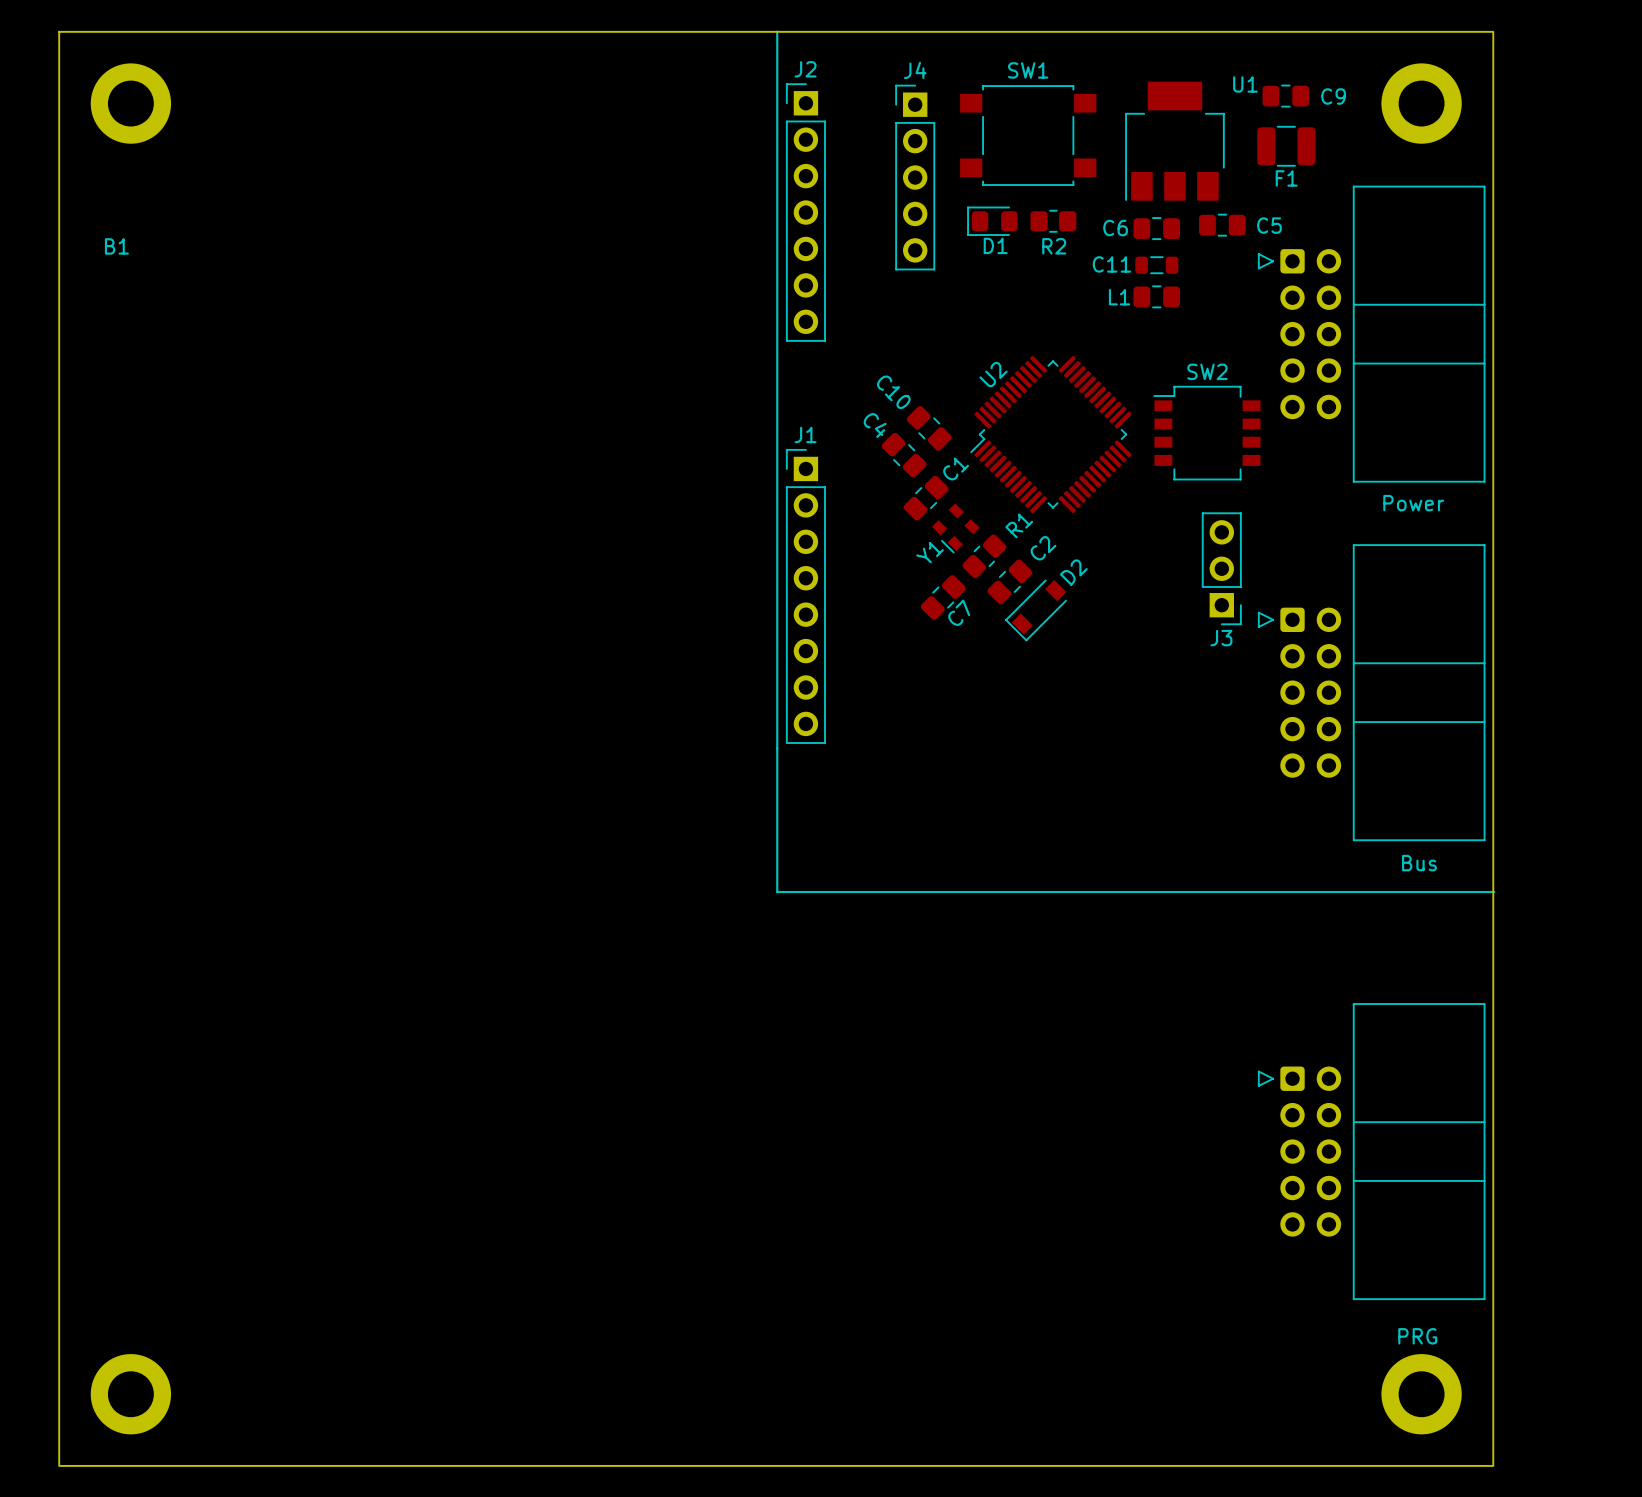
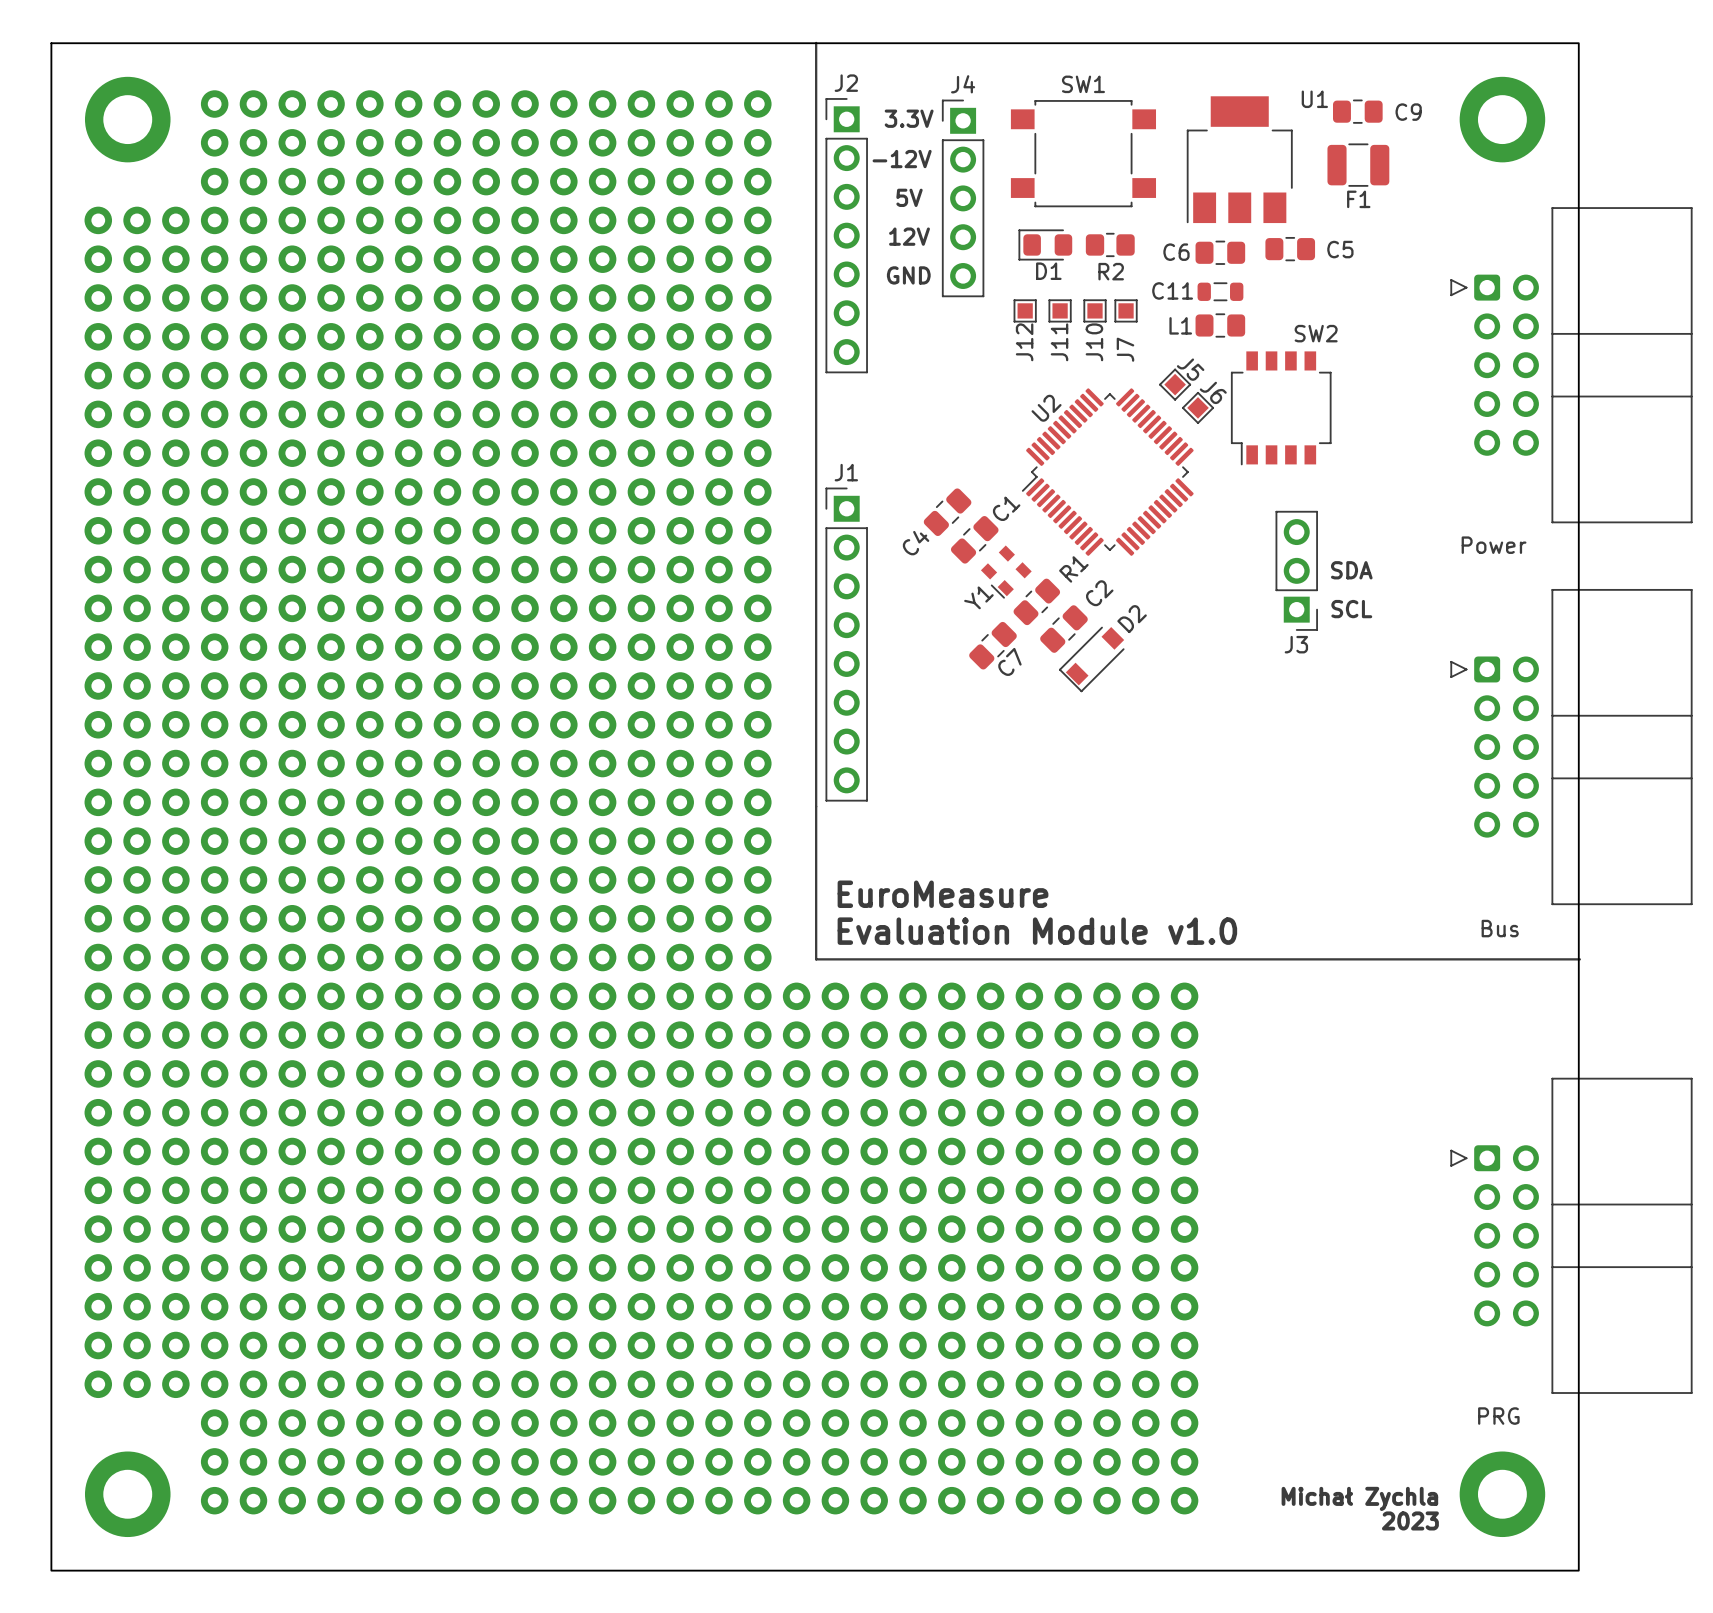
text: none -> 3.3V (909, 118)
text: none -> -12V (902, 159)
text: none -> 5V (909, 197)
text: none -> 12V (909, 236)
text: none -> GND (908, 275)
J12: none -> (1025, 310)
J11: none -> (1060, 310)
J10: none -> (1095, 310)
J7: none -> (1126, 310)
J5: none -> (1175, 384)
SW2 name position: SW2 (1207, 371) -> SW2 (1316, 333)
J6: none -> (1198, 407)
C4 name position: C4 (875, 425) -> C4 (916, 543)
C10: (929, 428) -> none
SW2 rotation: 0° (1207, 433) -> 90° counterclockwise (1281, 408)
C4 rotation: 0° (904, 455) -> 90° clockwise (947, 512)
text: none -> SDA (1351, 570)
text: none -> SCL (1351, 609)
J3 position: (1221, 568) -> (1296, 570)
part: none -> (641, 802)
B1: (776, 748) -> none
part: none -> (871, 806)
text: none -> EuroMeasure (943, 894)
text: none -> Evaluation Module v1.0 (1037, 931)
text: none -> Michał Zychla (1359, 1498)
text: none -> 2023 (1410, 1520)

